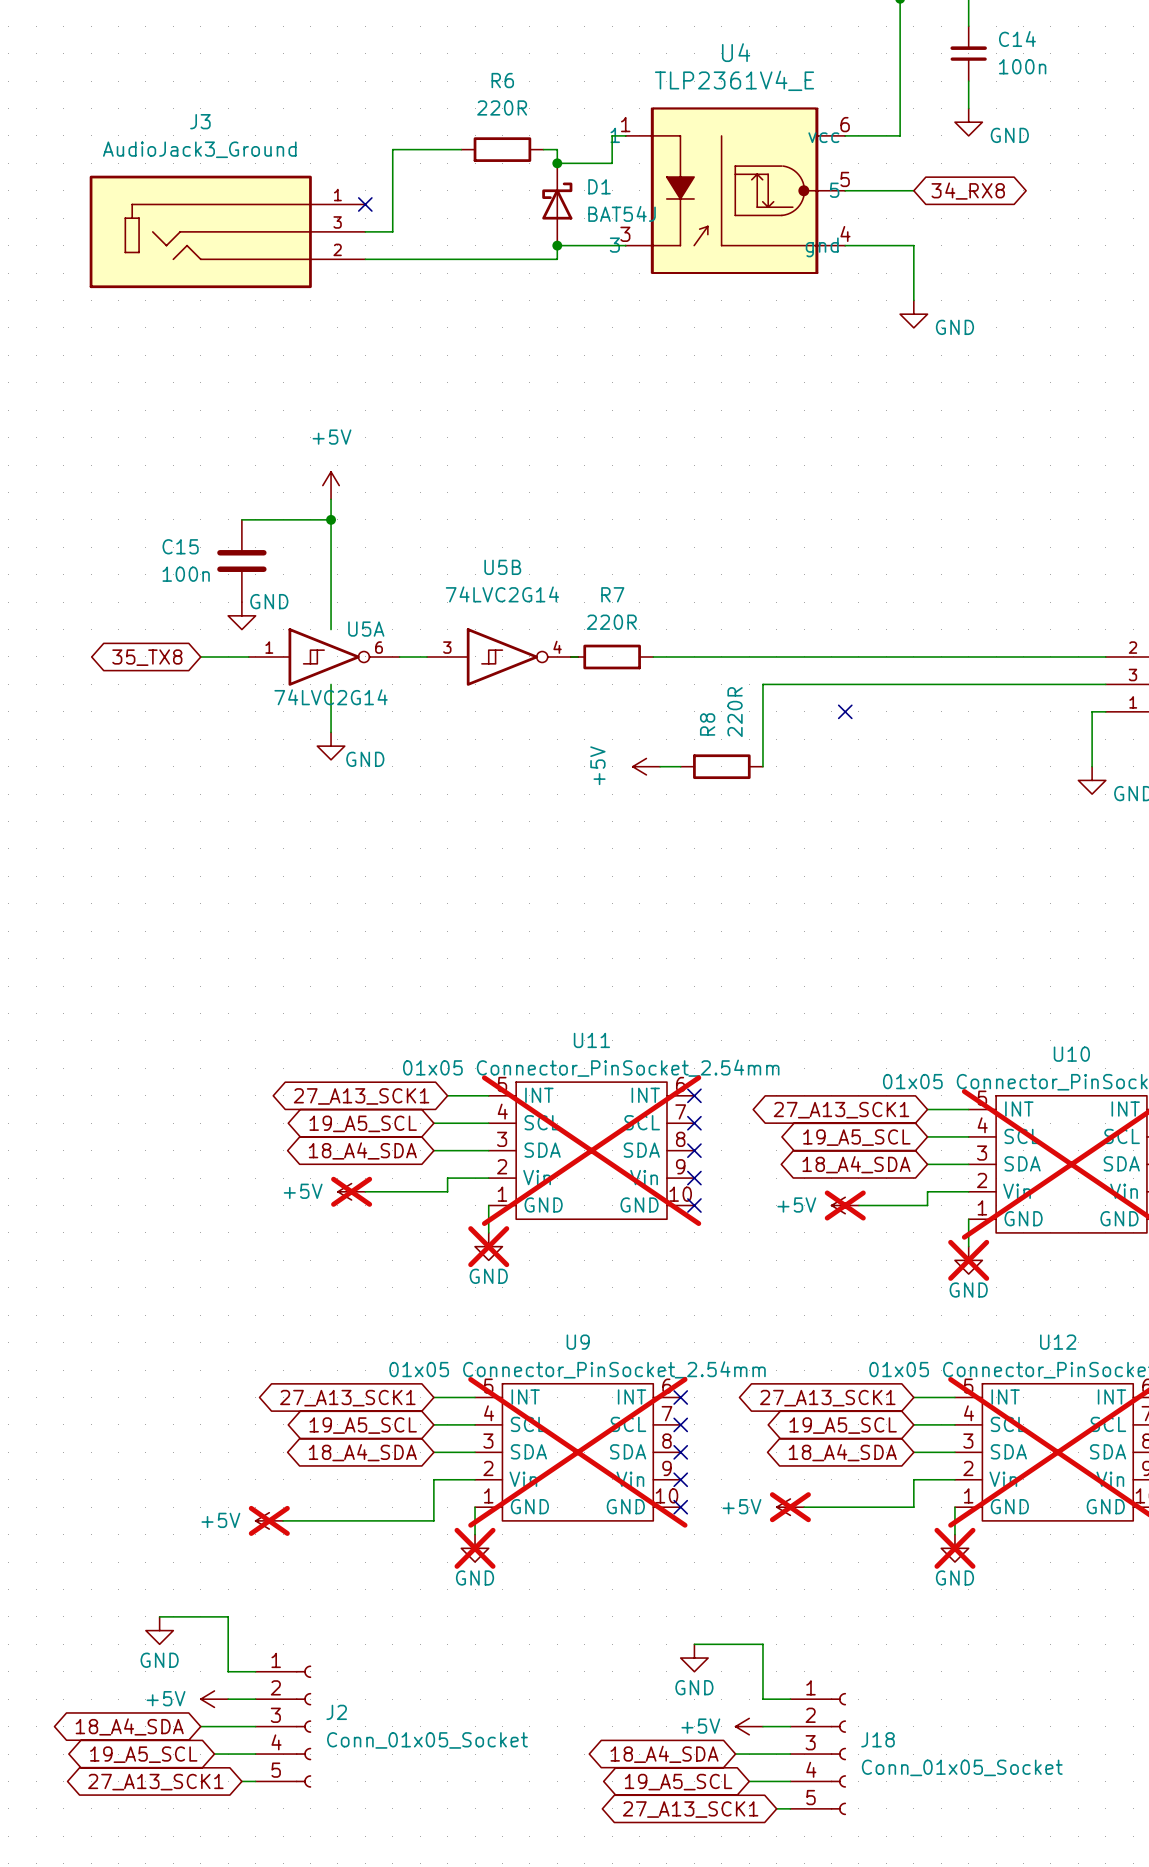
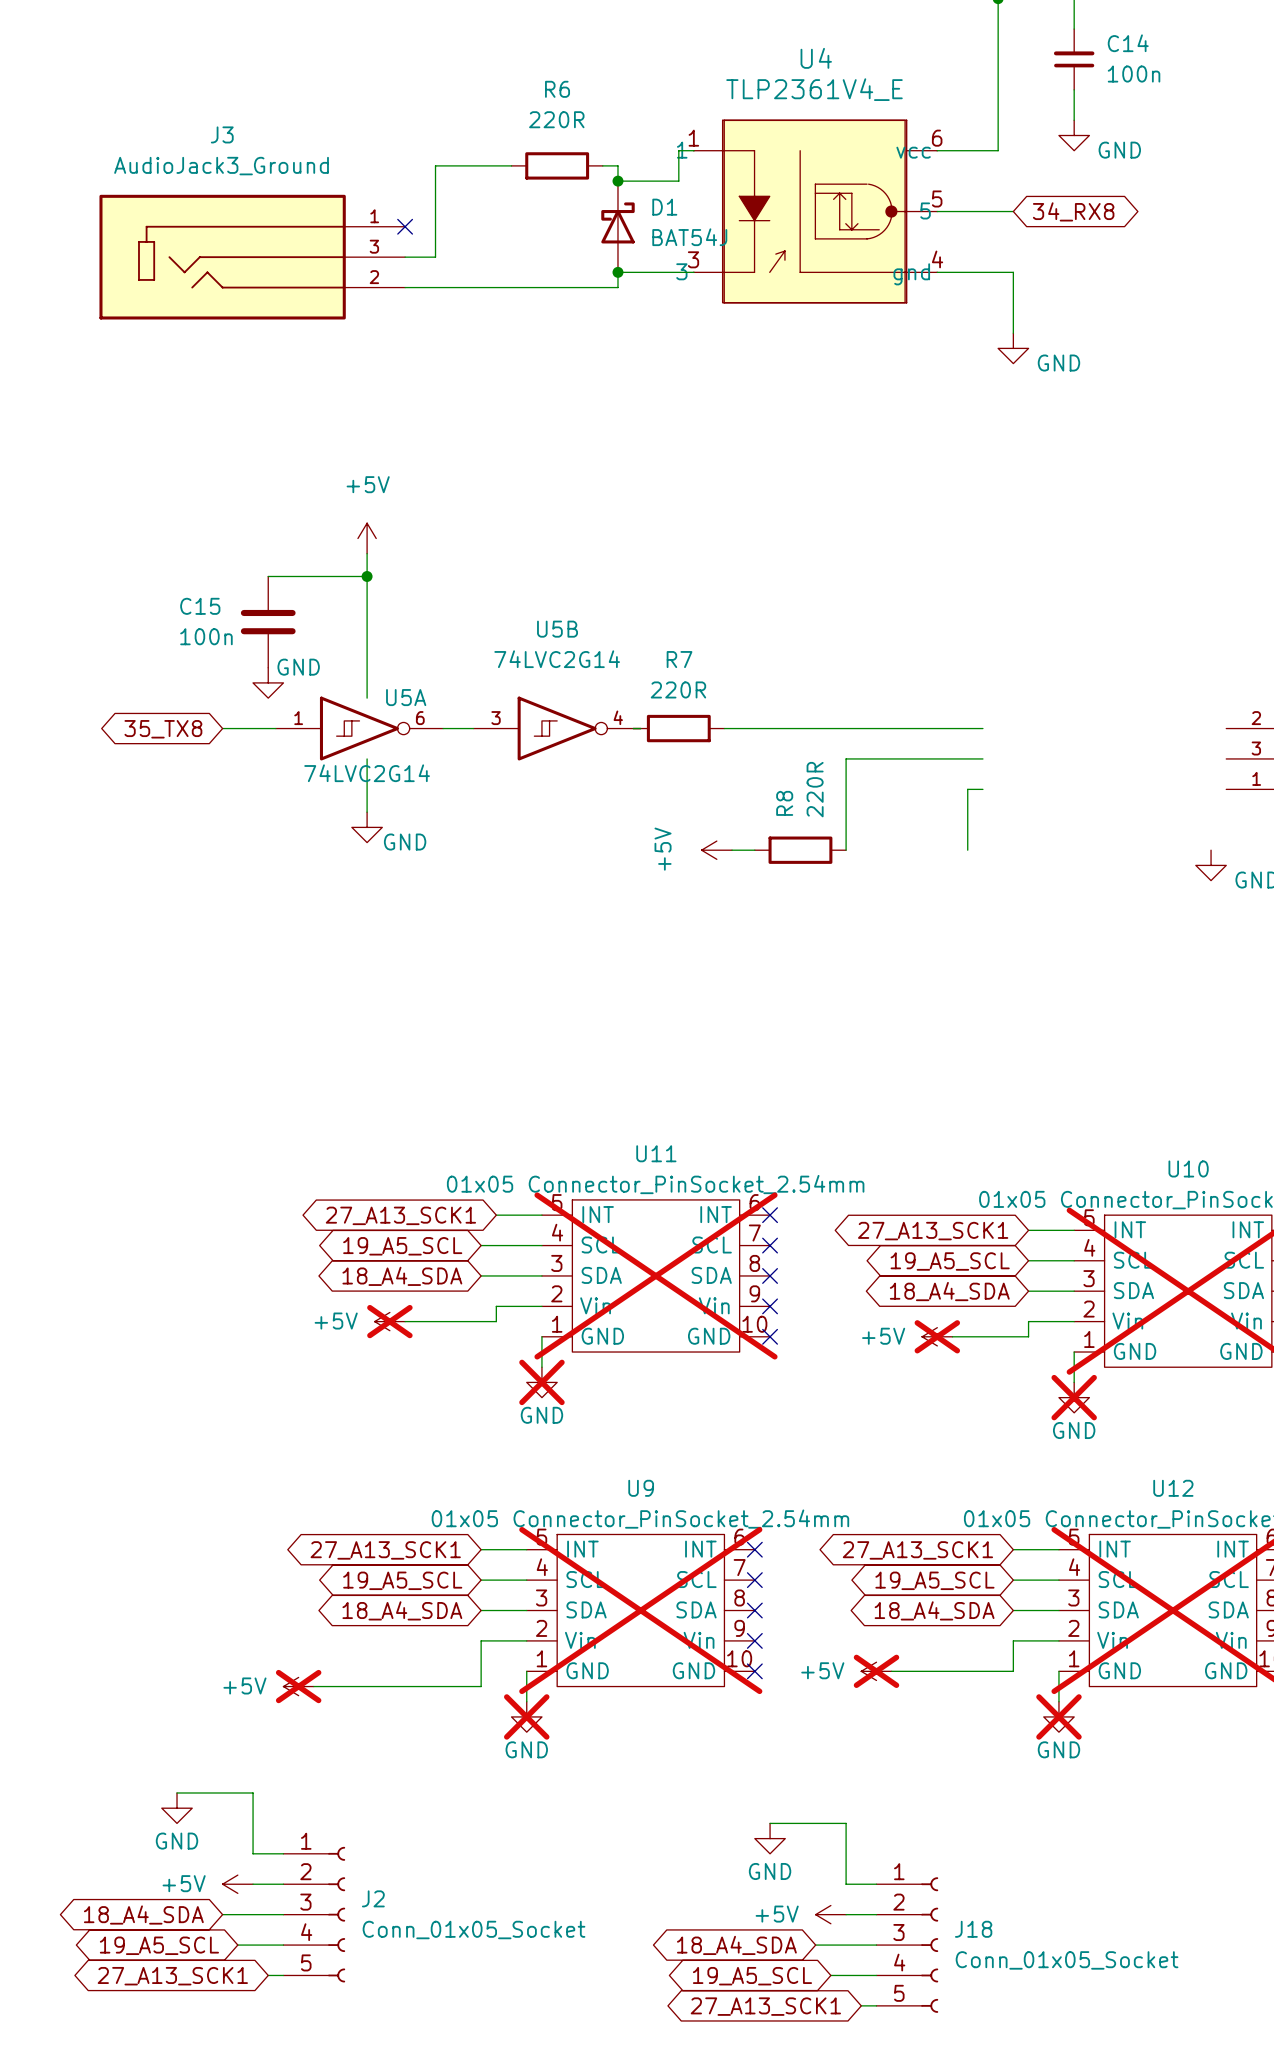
wire: (886, 656) (1105, 656) -> none
wire: (886, 684) (1105, 684) -> none
no-connect mark: (845, 711) -> none
wire: (1105, 711) (1092, 711) (1092, 766) -> (982, 789) (967, 789) (967, 850)

